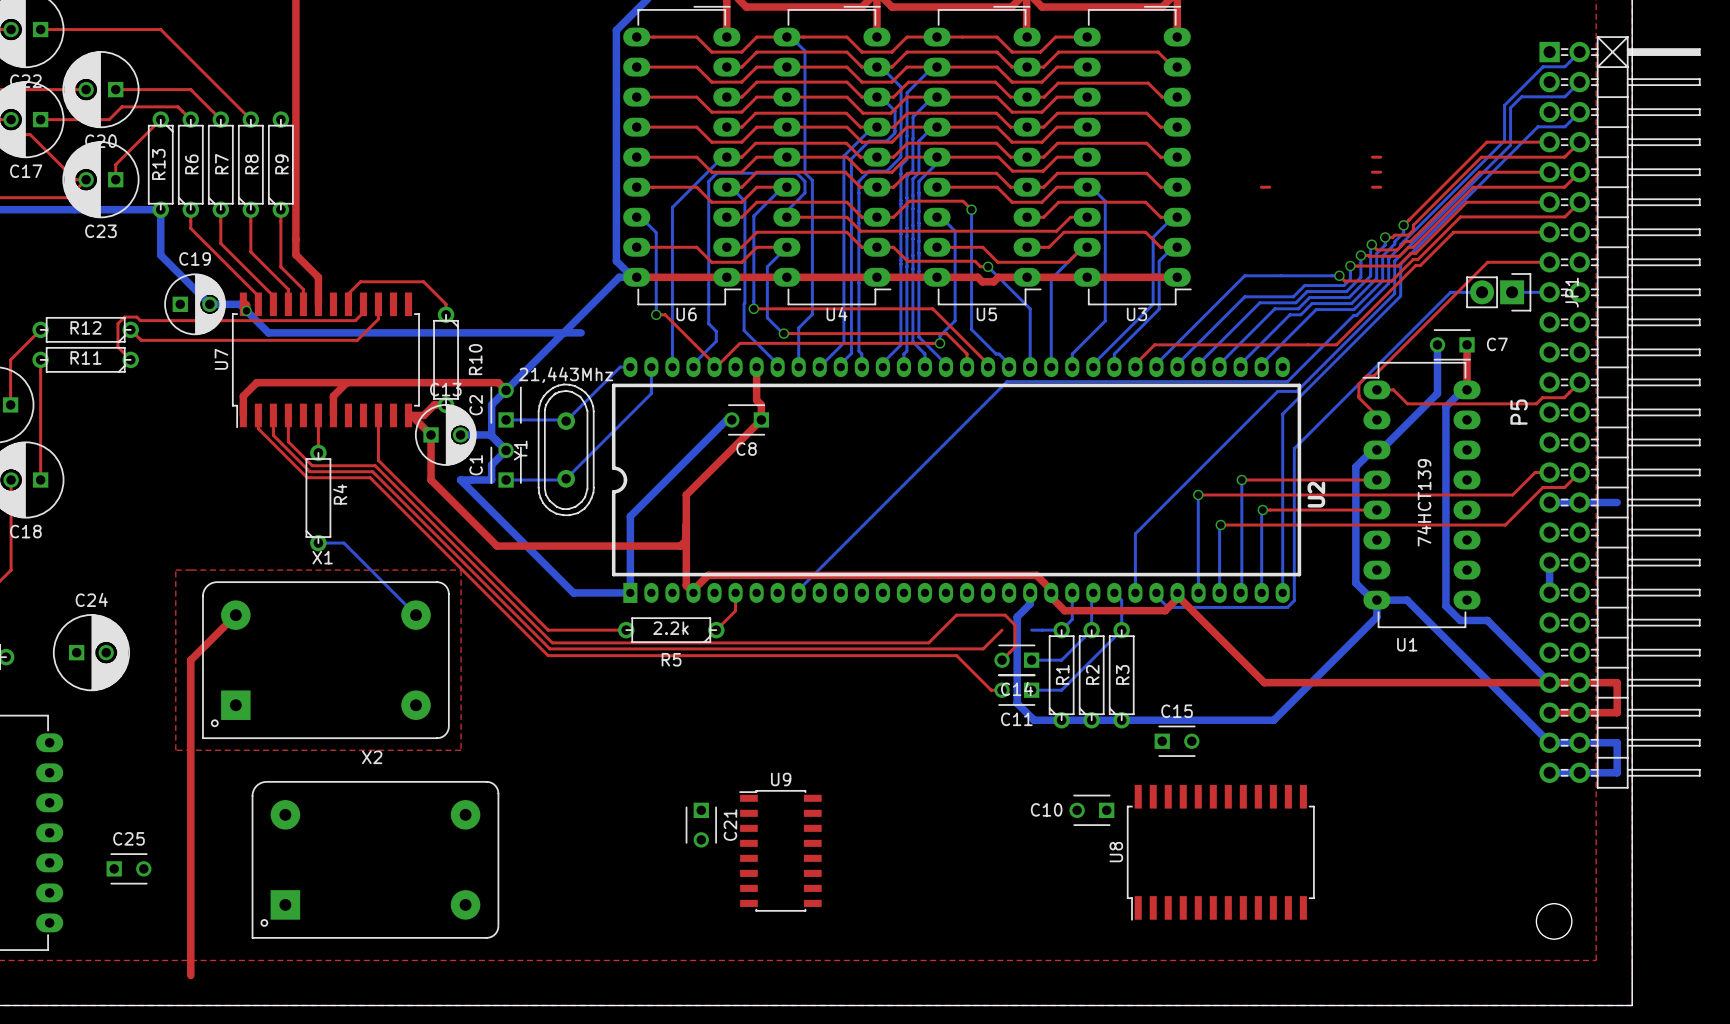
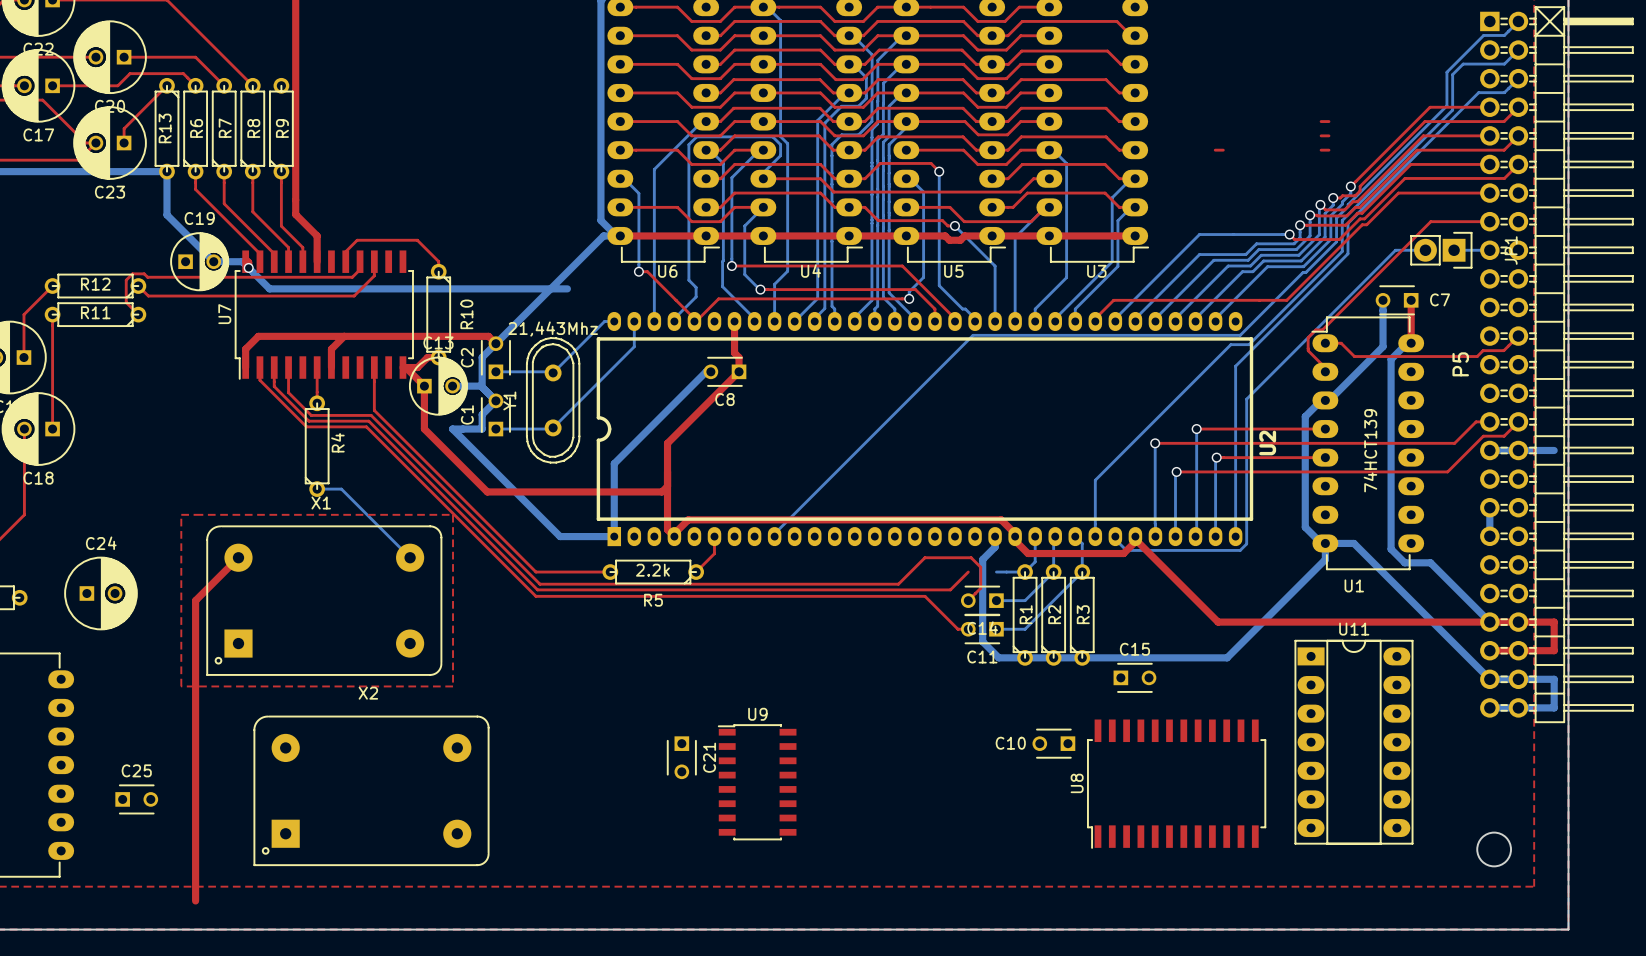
U11: none -> (1353, 742)

